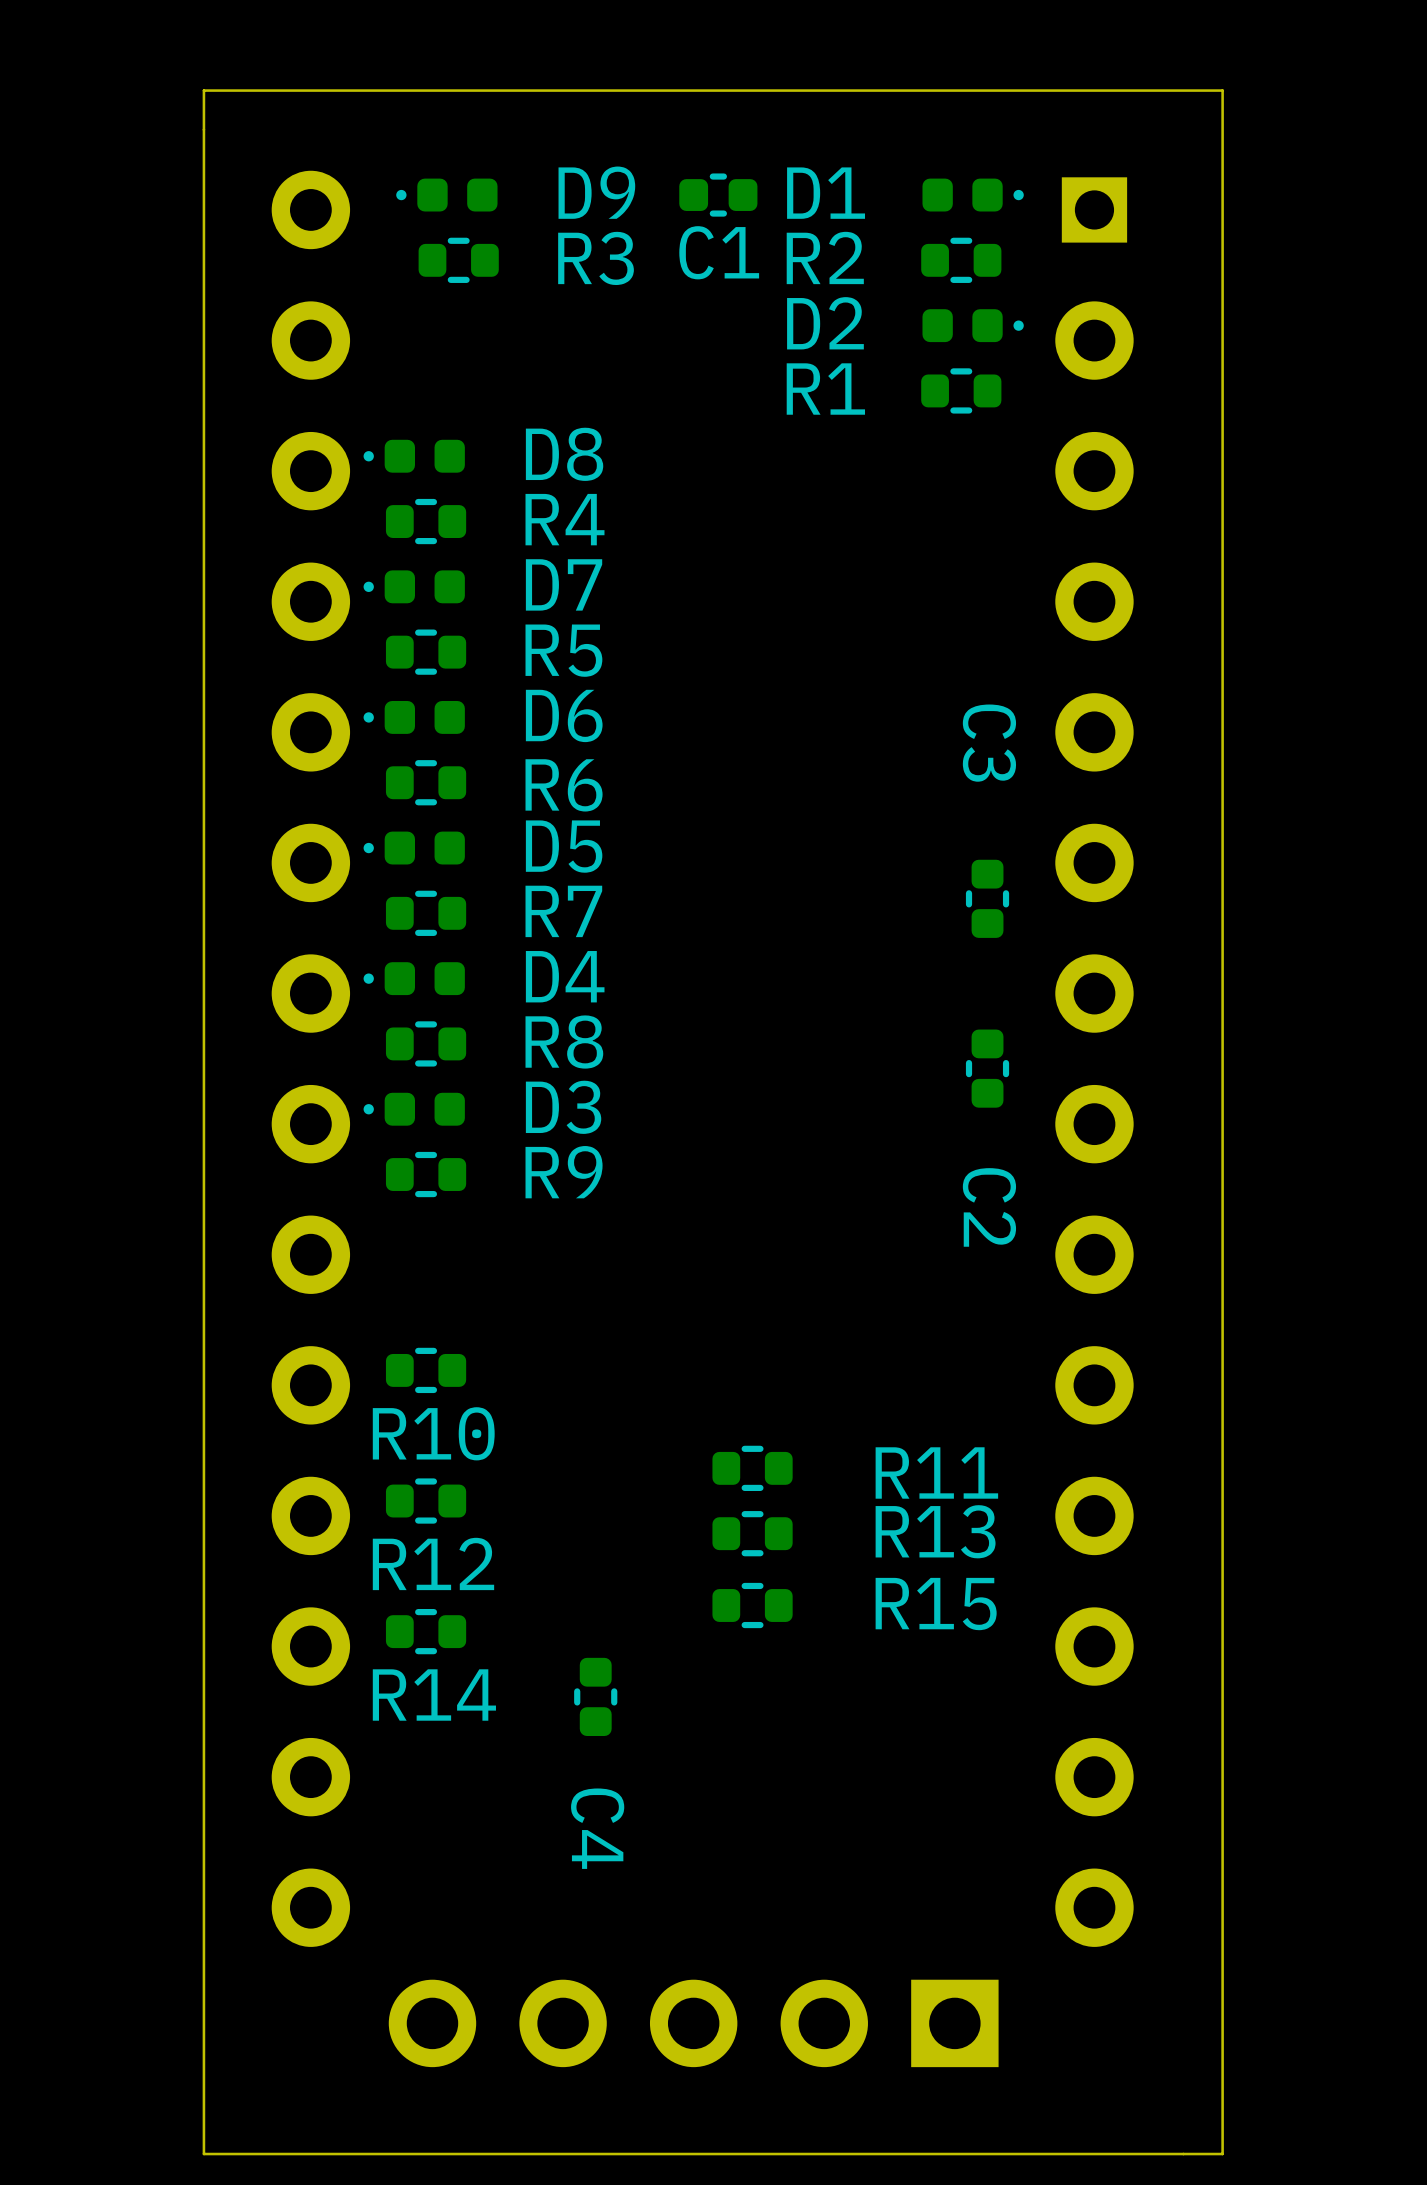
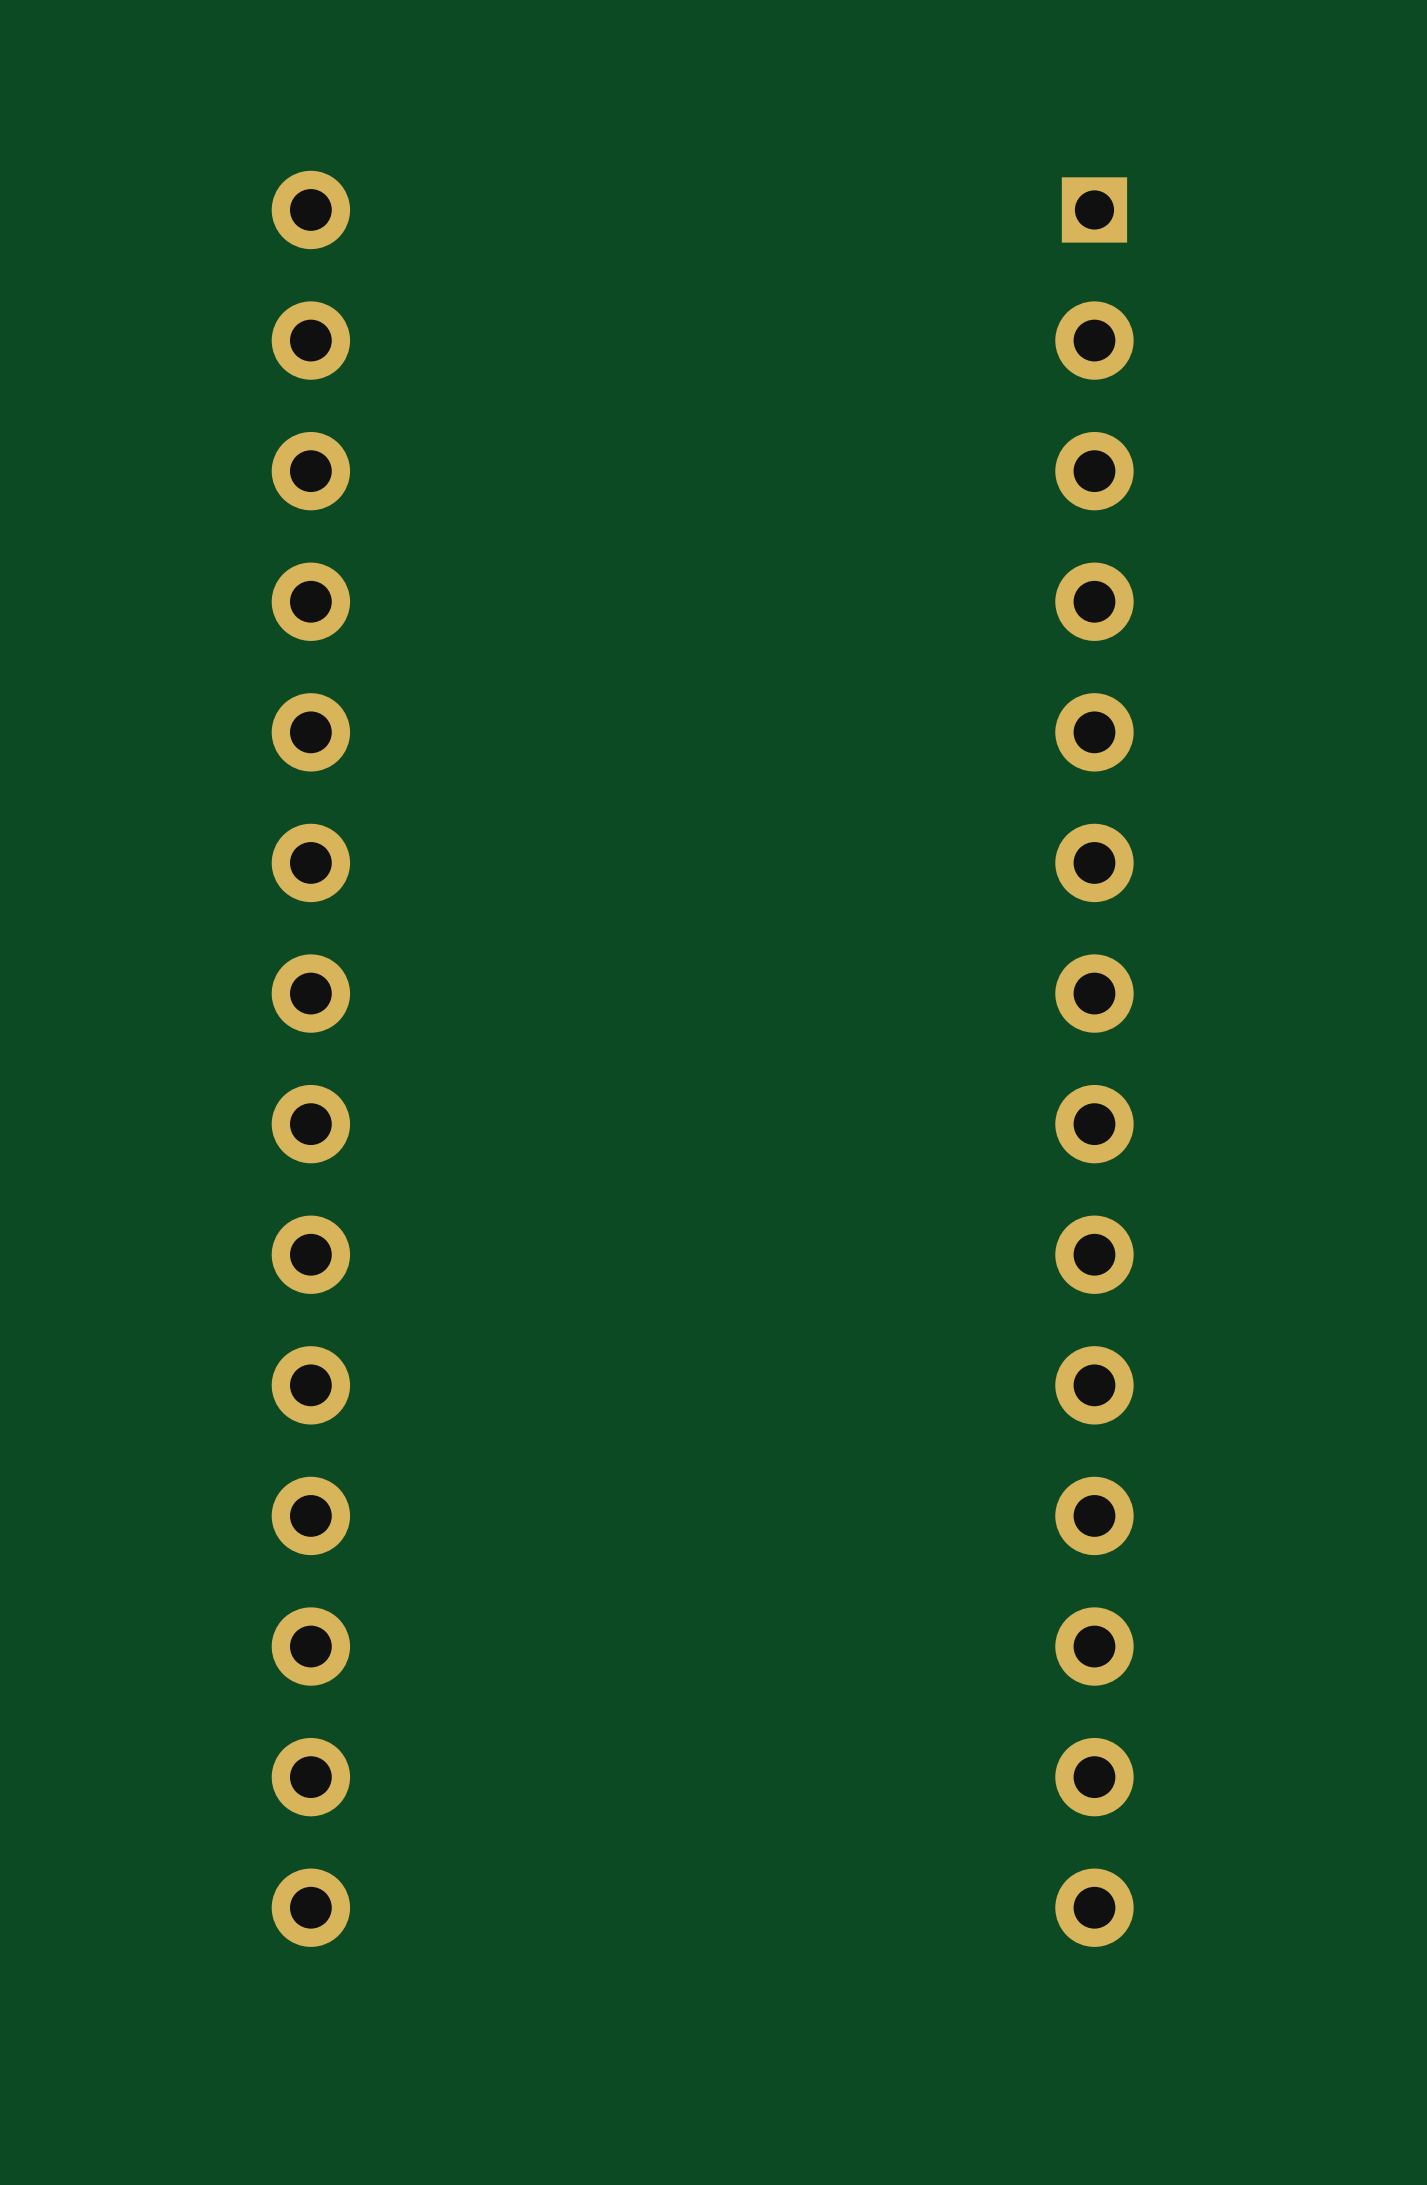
board edge: (1222, 90) (1222, 2154) (203, 2154) (203, 90) (1222, 90) -> none
D9: (446, 195) -> none
C1: (718, 195) -> none
D1: (973, 195) -> none
R3: (458, 260) -> none
R2: (961, 260) -> none
D2: (973, 325) -> none
R1: (961, 390) -> none
D8: (414, 456) -> none
R4: (426, 521) -> none
D7: (414, 586) -> none
R5: (426, 652) -> none
D6: (414, 717) -> none
R6: (426, 782) -> none
D5: (414, 848) -> none
C3: (987, 898) -> none
R7: (426, 913) -> none
D4: (414, 978) -> none
R8: (426, 1043) -> none
C2: (987, 1068) -> none
D3: (414, 1109) -> none
R9: (426, 1174) -> none
R10: (426, 1370) -> none
R11: (752, 1468) -> none
R12: (426, 1501) -> none
R13: (752, 1533) -> none
R15: (752, 1605) -> none
R14: (426, 1631) -> none
C4: (595, 1696) -> none
part: (693, 2023) -> none

